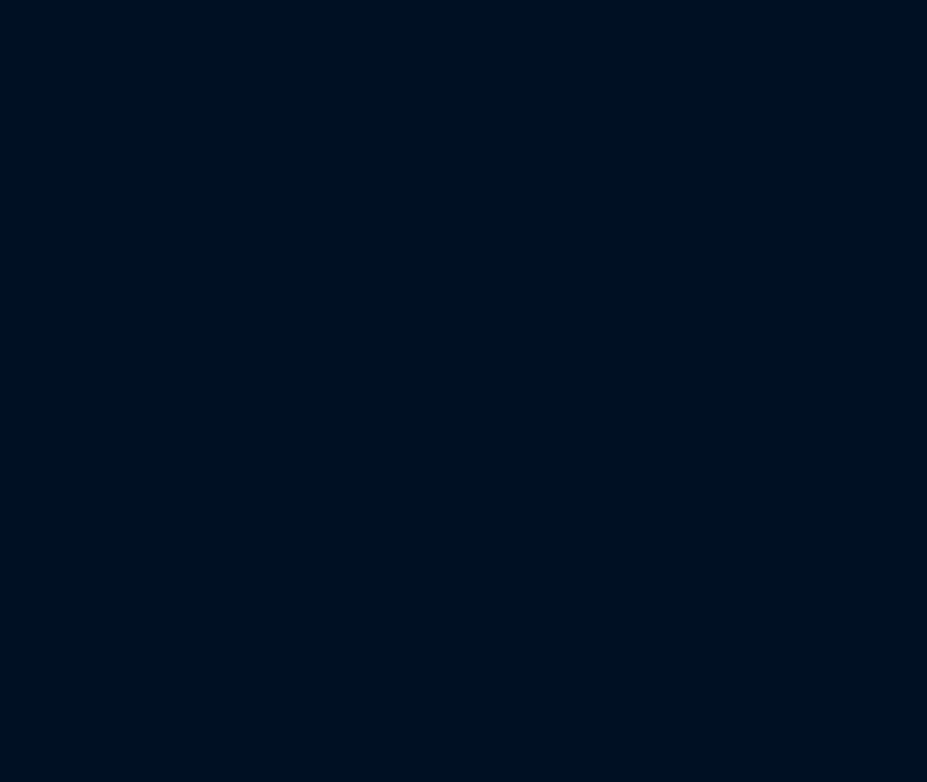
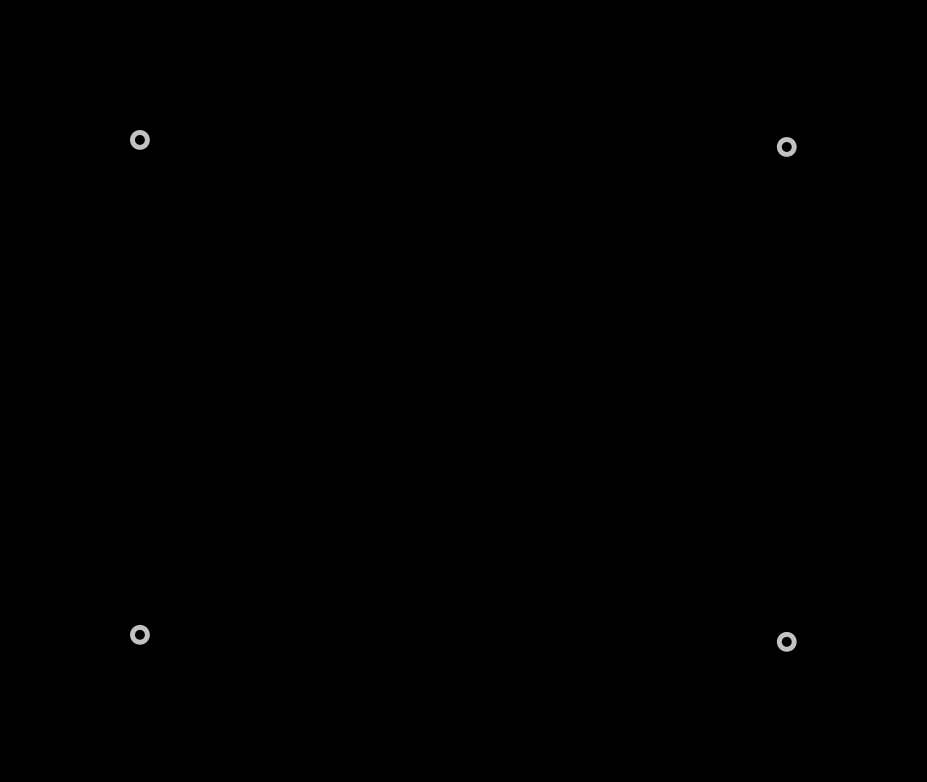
via: none -> (139, 139)
via: none -> (786, 146)
via: none -> (139, 634)
via: none -> (786, 641)

